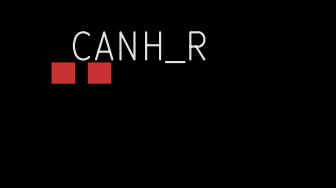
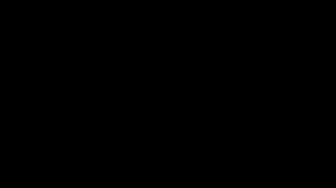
CANH_R: (81, 73) -> none

